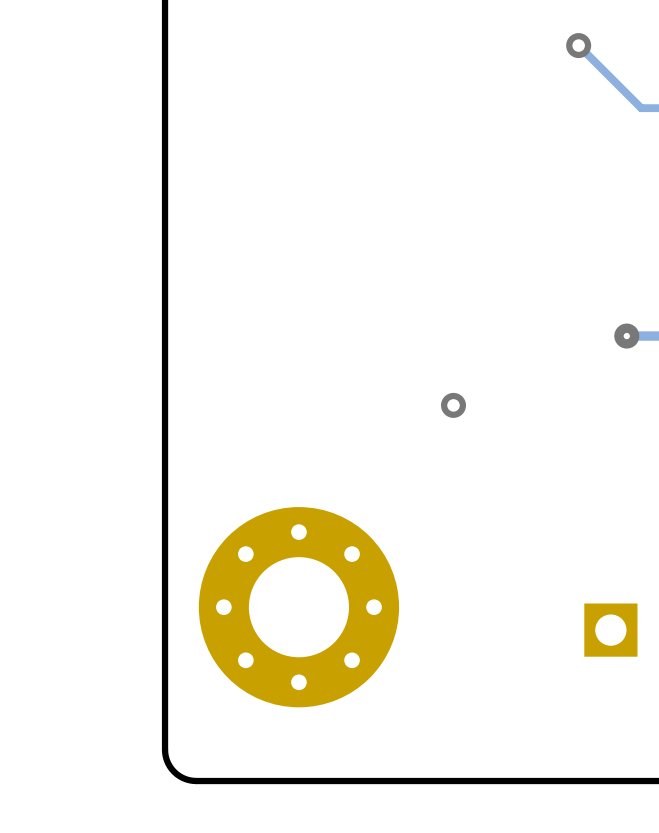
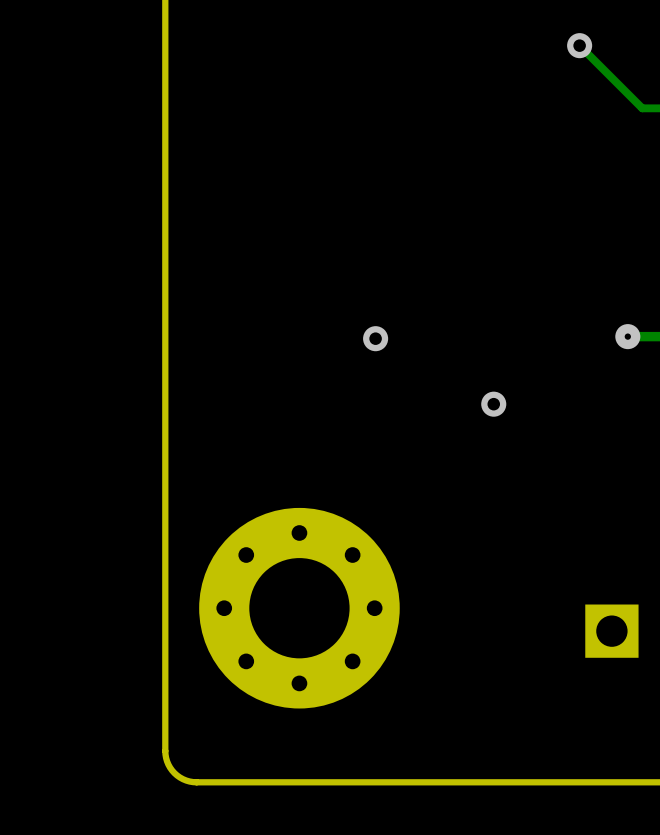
via: none -> (375, 338)
via position: (453, 405) -> (493, 404)

